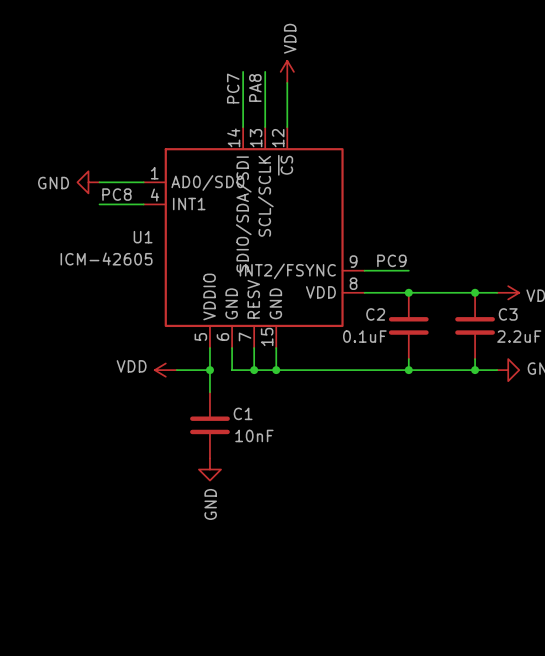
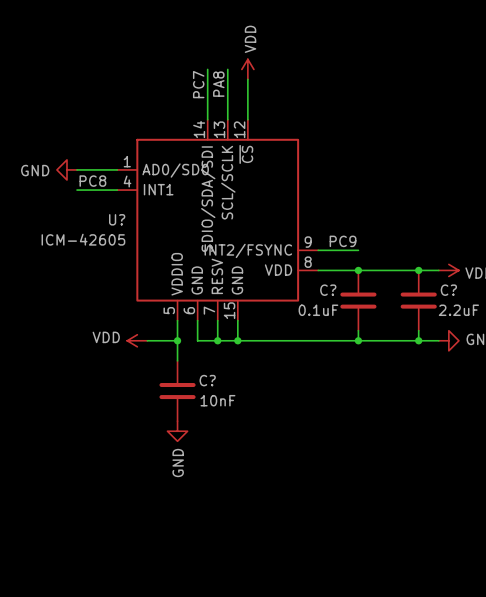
U1 name: U1 (143, 237) -> U? (117, 219)
C2 name: C2 (375, 314) -> C? (328, 290)
C3 name: C3 (508, 314) -> C? (448, 290)
C1 name: C1 (243, 413) -> C? (207, 380)

